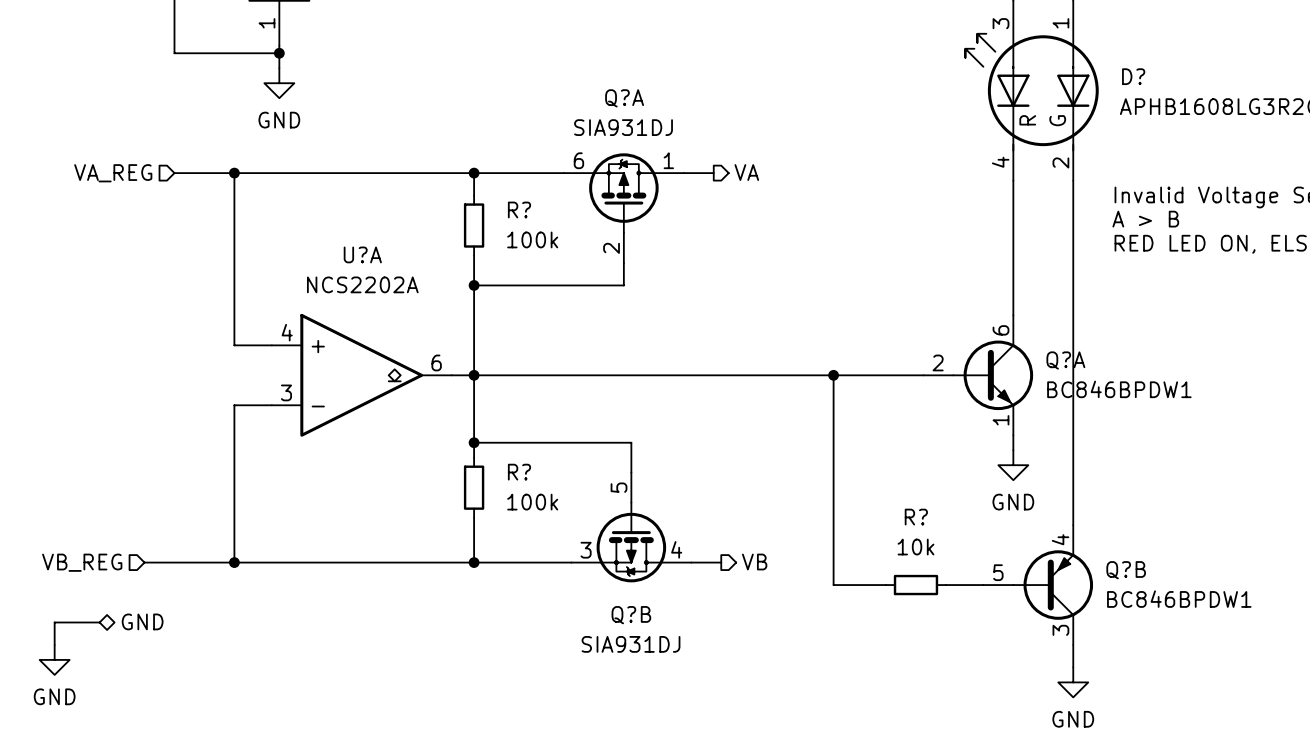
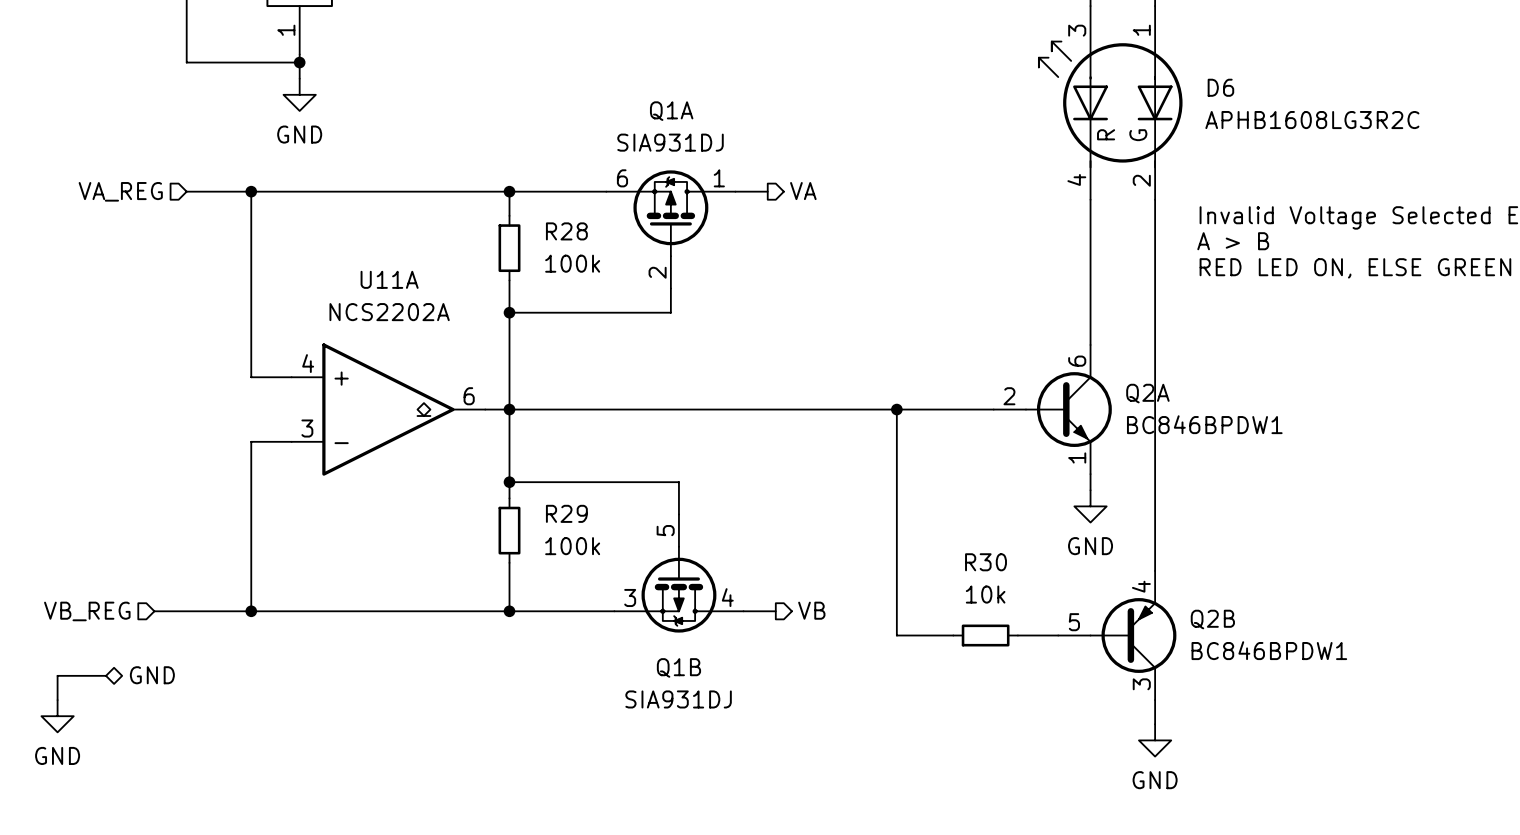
D? name: D? (1133, 76) -> D6 (1220, 87)
Q?A name: Q?A (624, 98) -> Q1A (671, 111)
R? name: R? (519, 209) -> R28 (566, 231)
U?A name: U?A (362, 254) -> U11A (389, 279)
Q?A name: Q?A (1065, 360) -> Q2A (1147, 393)
R? name: R? (519, 472) -> R29 (566, 513)
R? name: R? (916, 517) -> R30 (986, 562)
Q?B name: Q?B (1126, 570) -> Q2B (1212, 619)
Q?B name: Q?B (631, 615) -> Q1B (678, 667)

